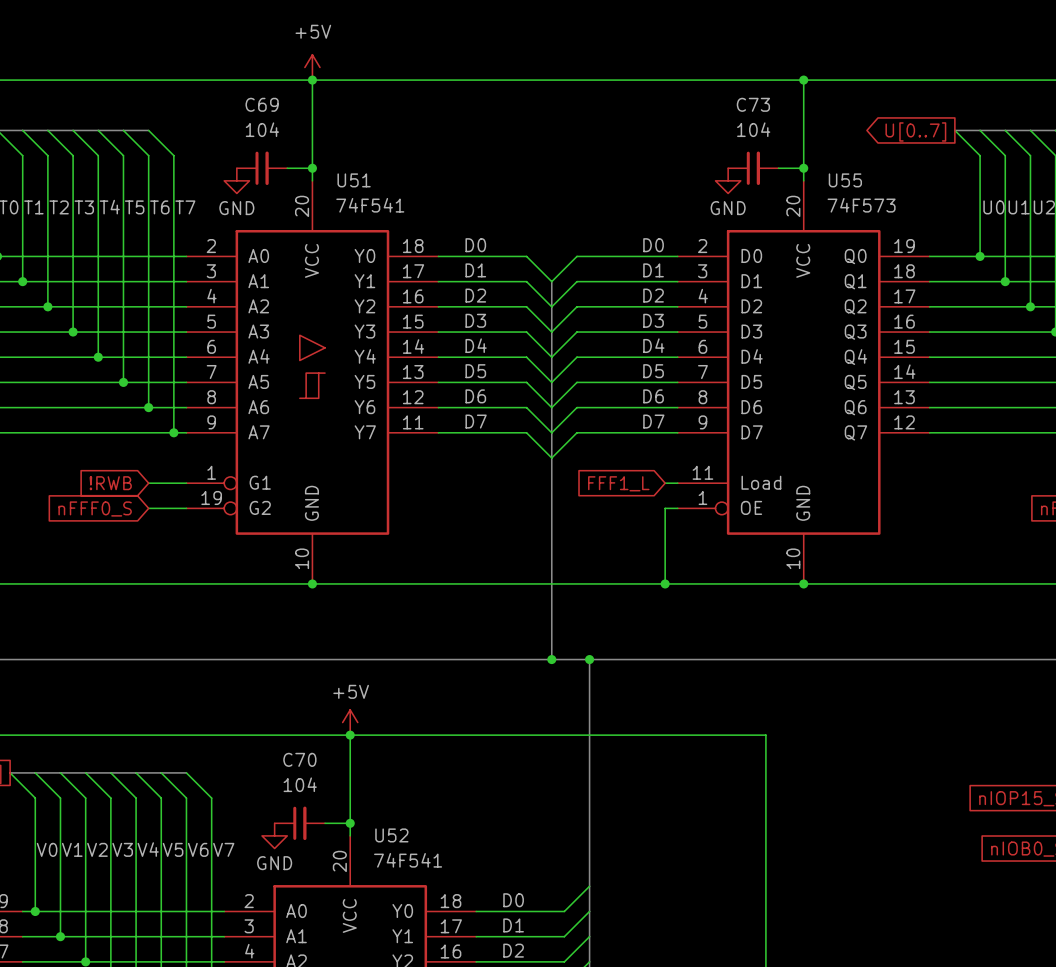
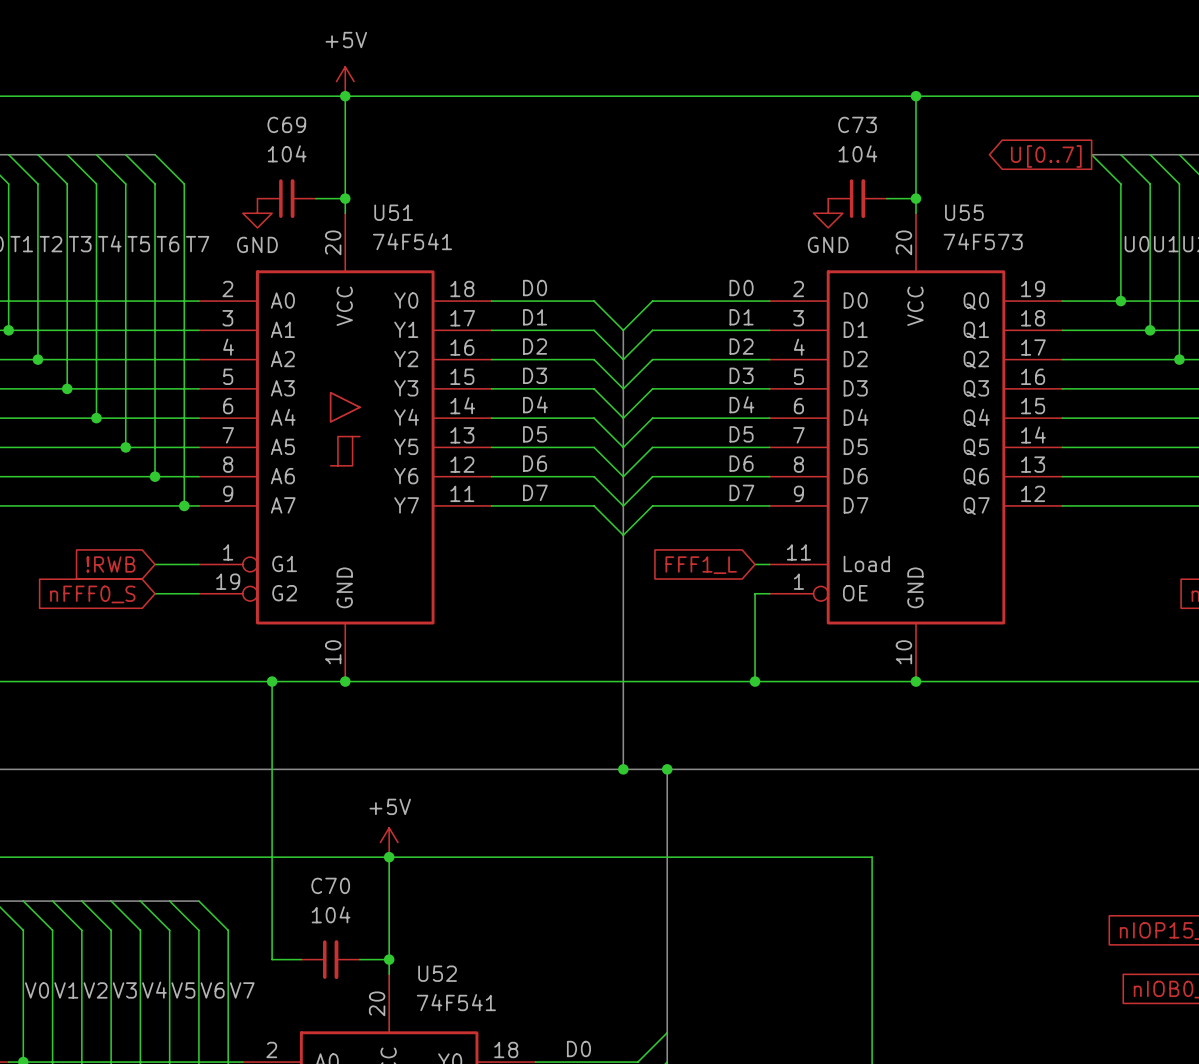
wire: none -> (272, 681) (272, 959) (301, 959)
junction: none -> (272, 681)
power symbol: GND (274, 835) -> none

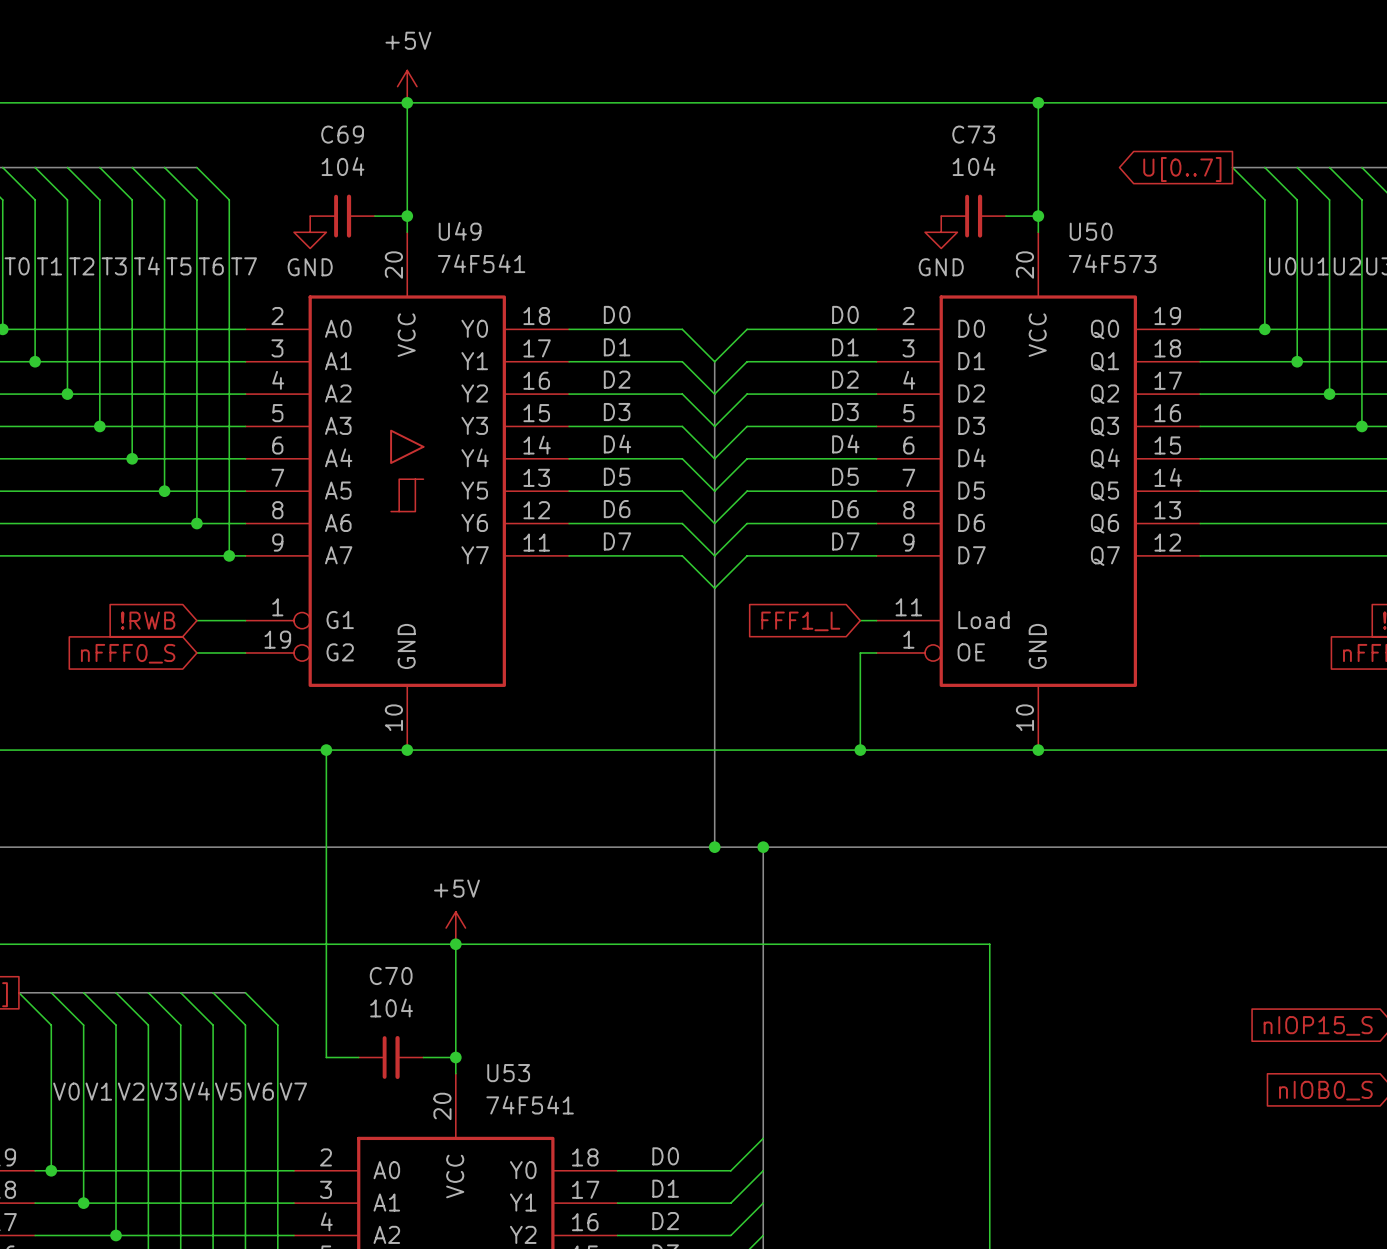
U51 name: U51 (393, 212) -> U49 (460, 231)
U55 name: U55 (964, 212) -> U50 (1091, 231)
U52 name: U52 (437, 973) -> U53 (508, 1073)

